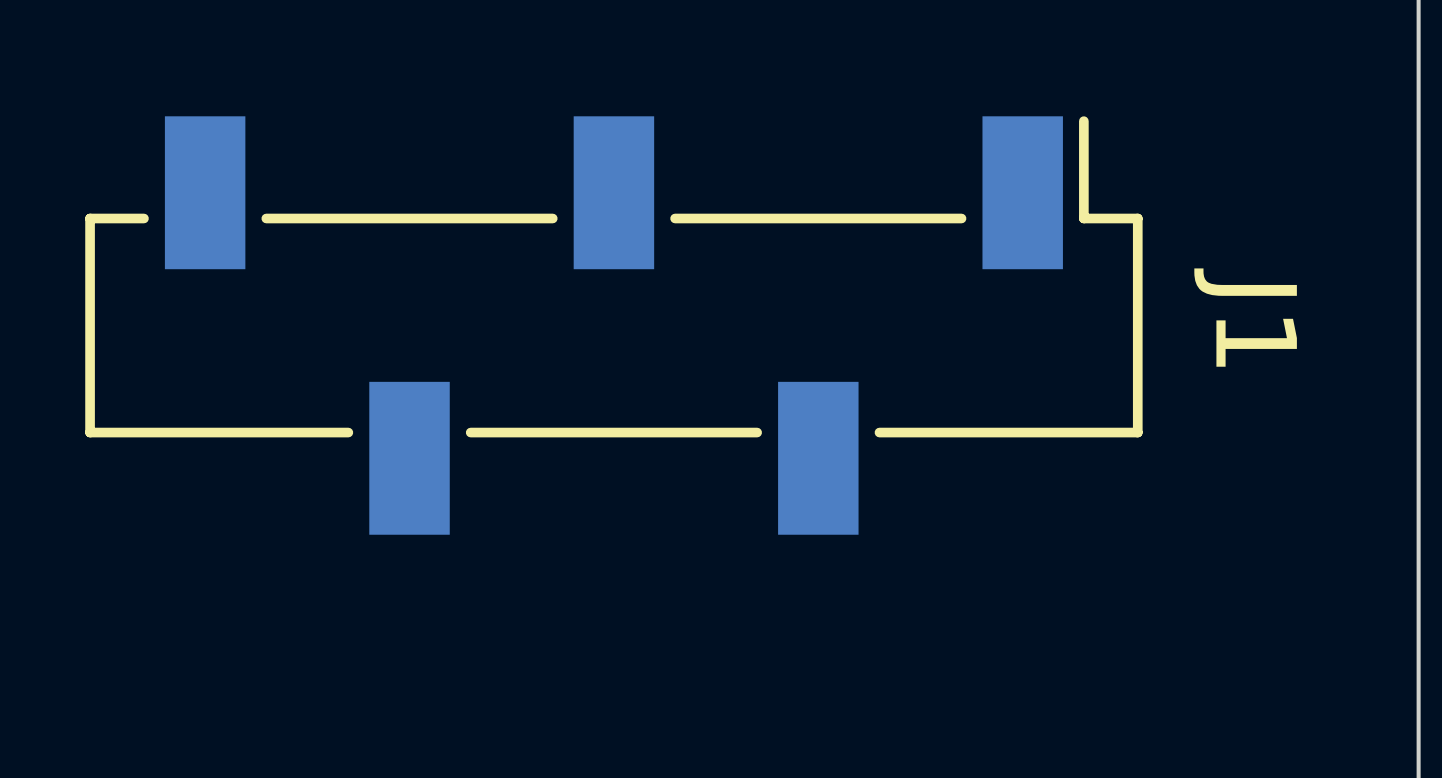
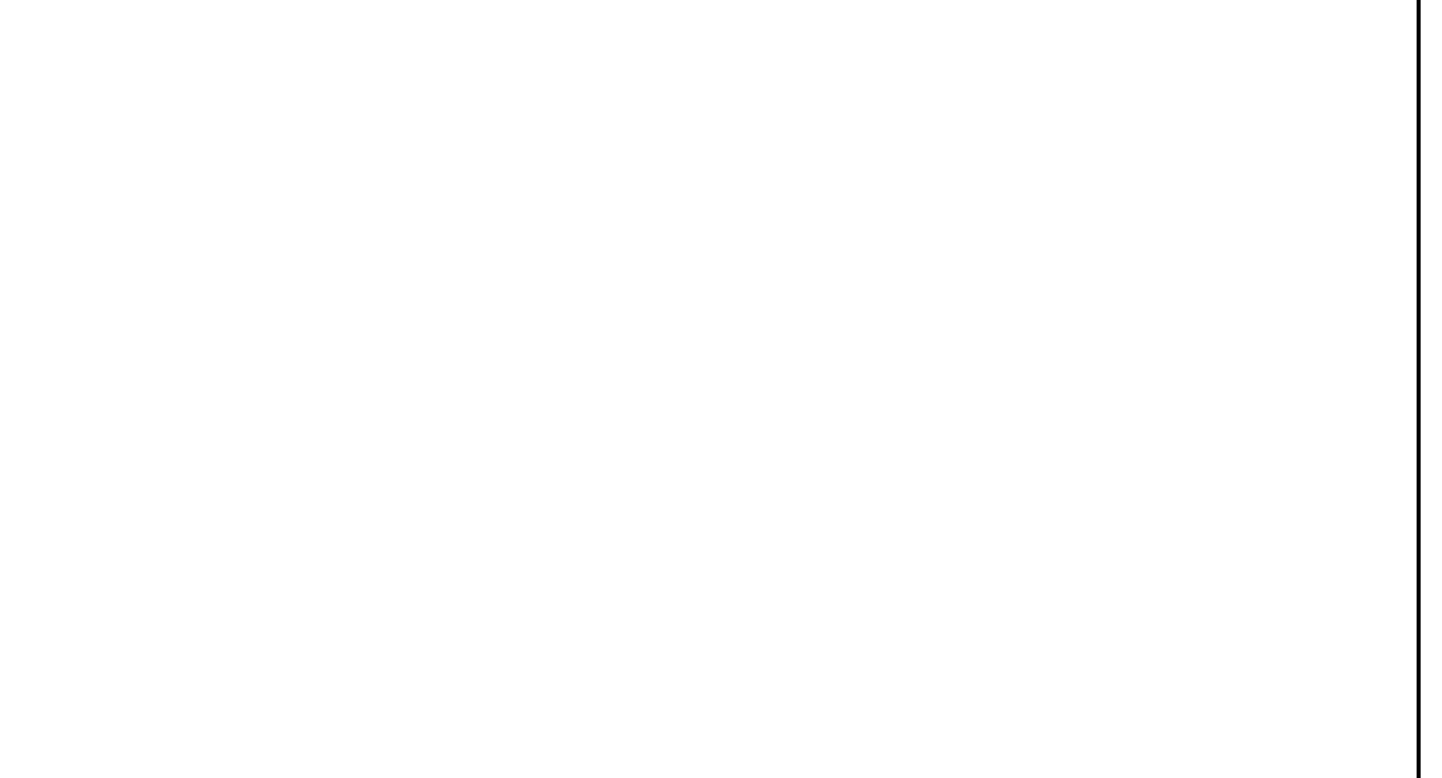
J1: (613, 325) -> none

